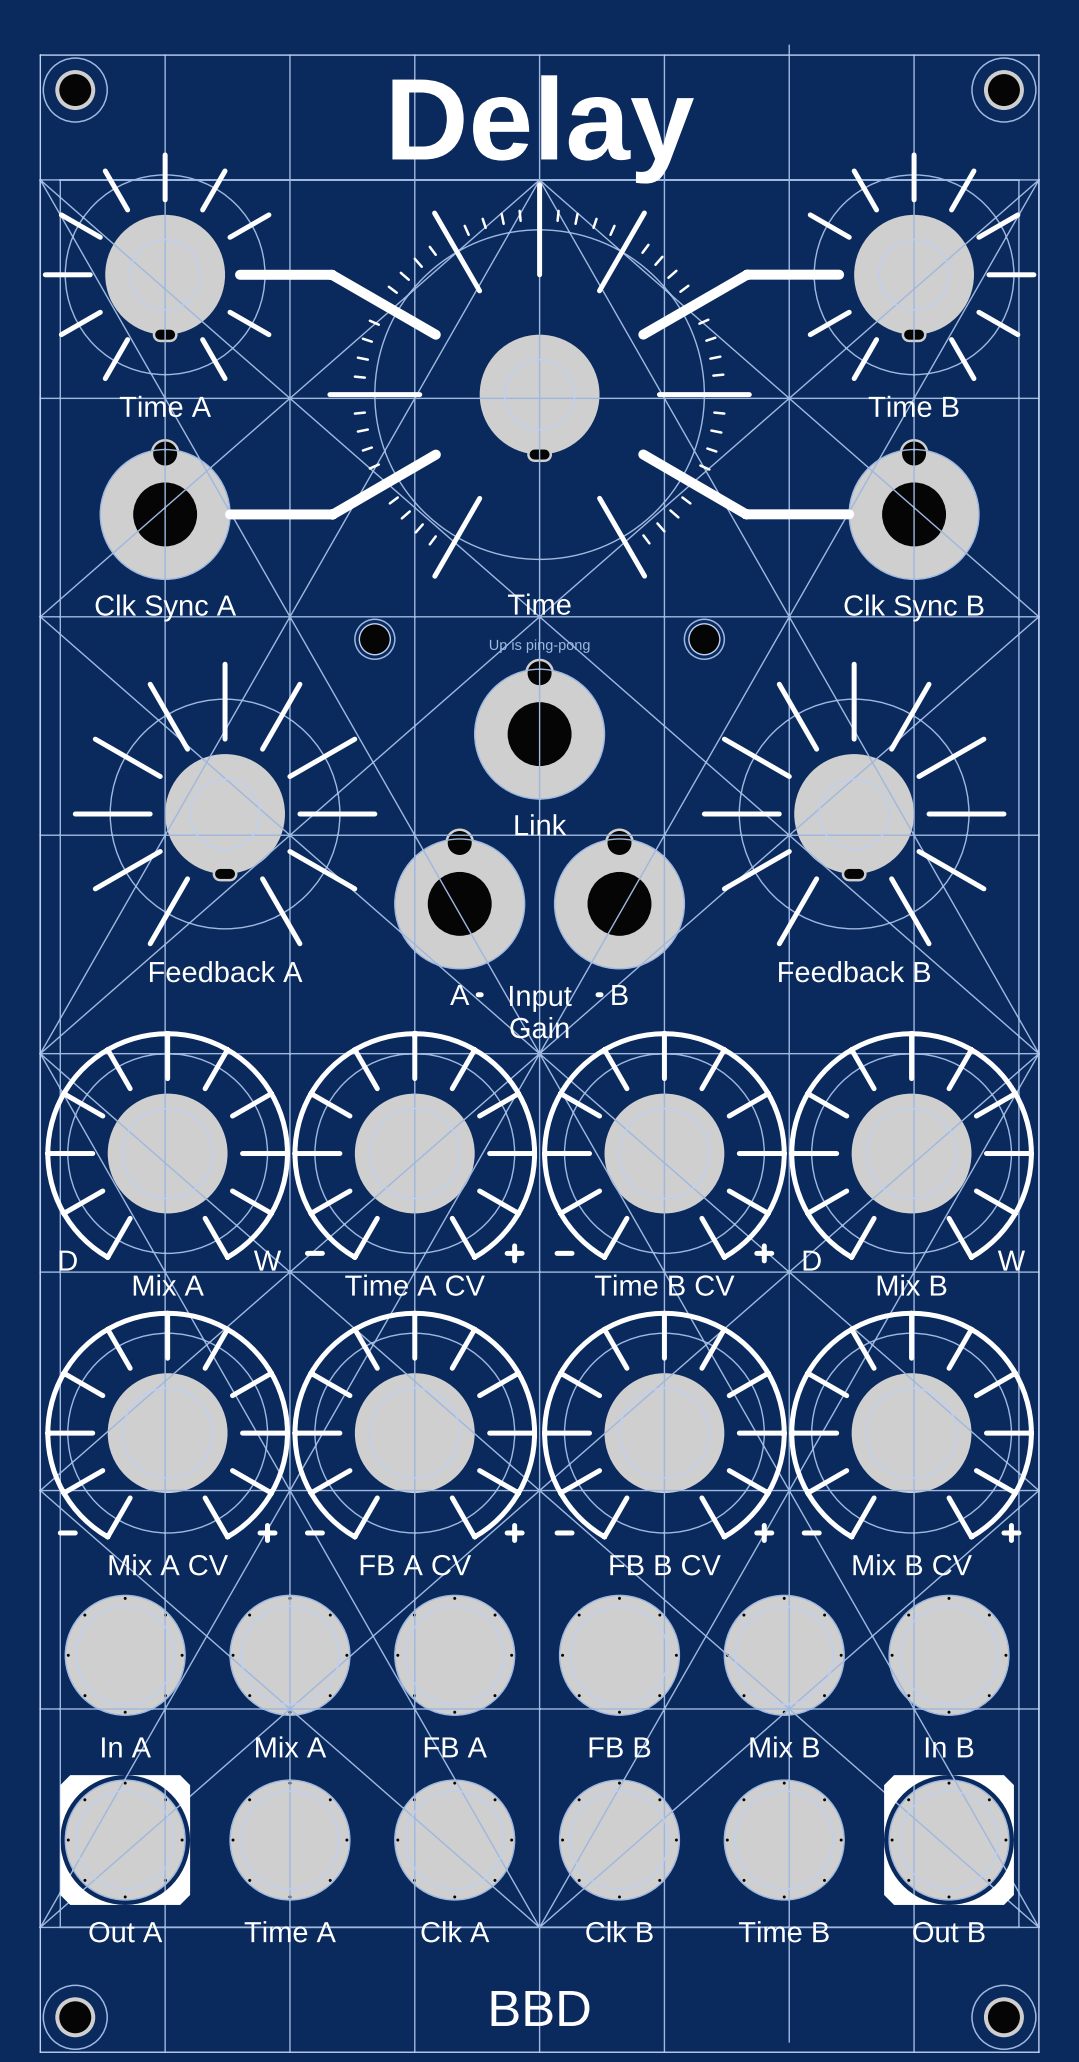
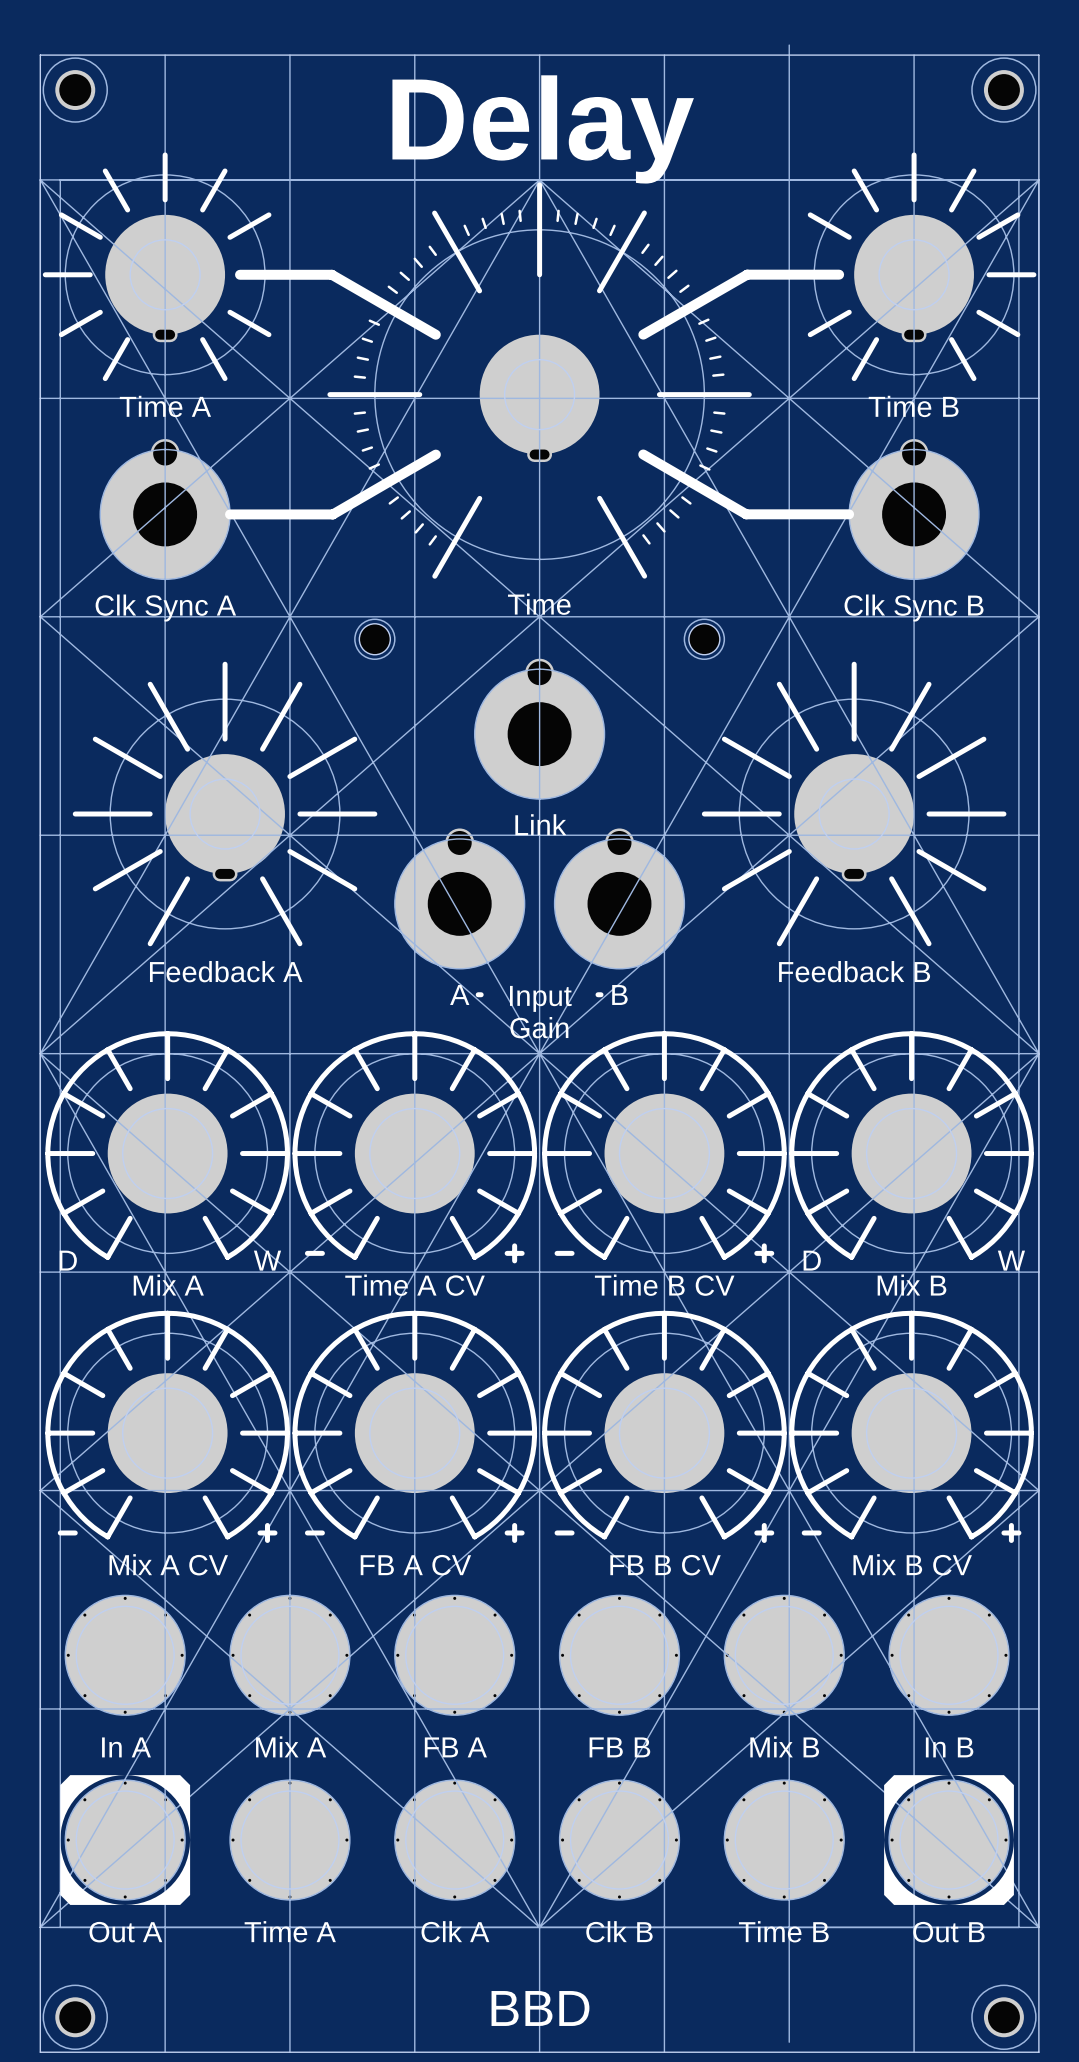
text: Up is ping-pong (539, 646) -> none

